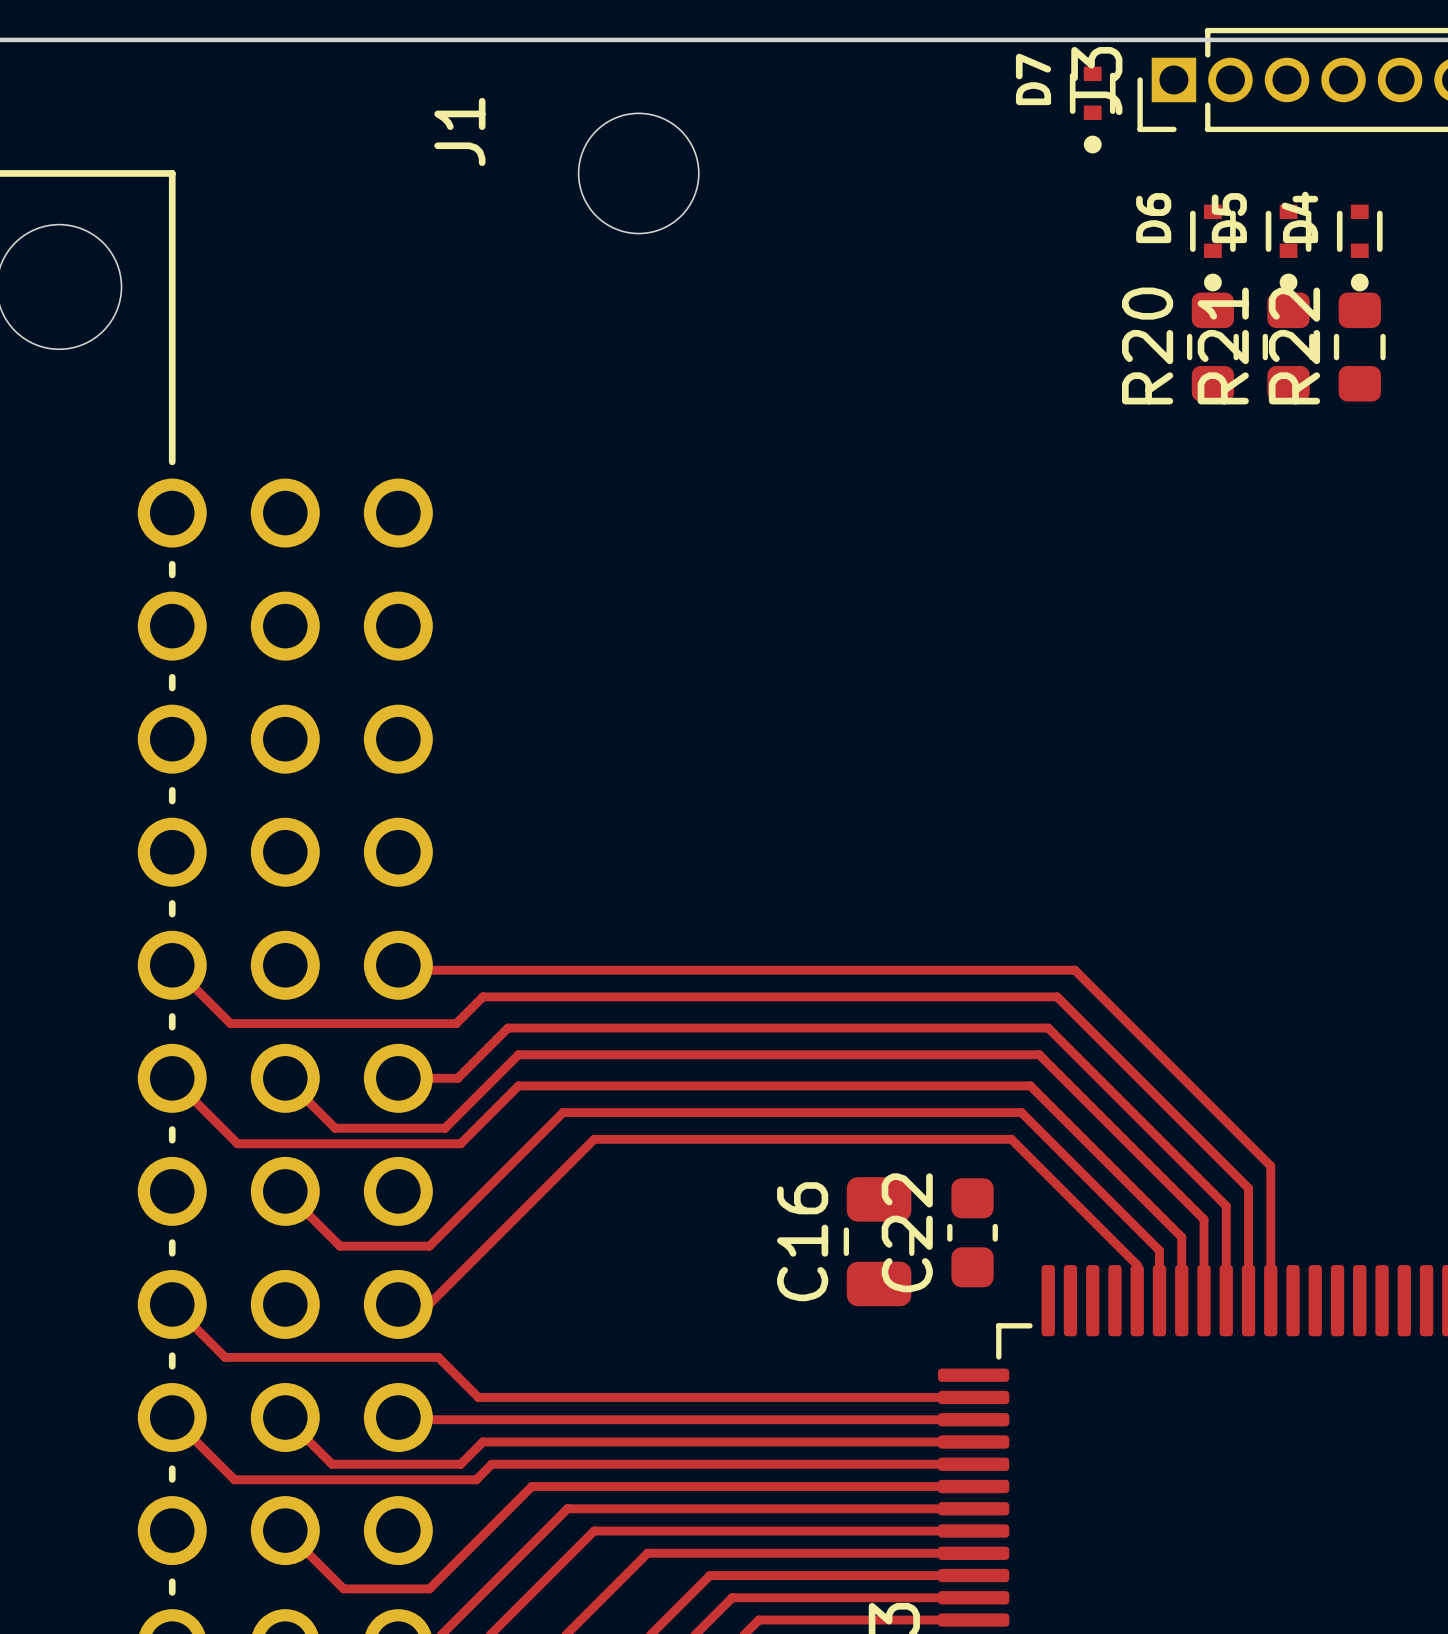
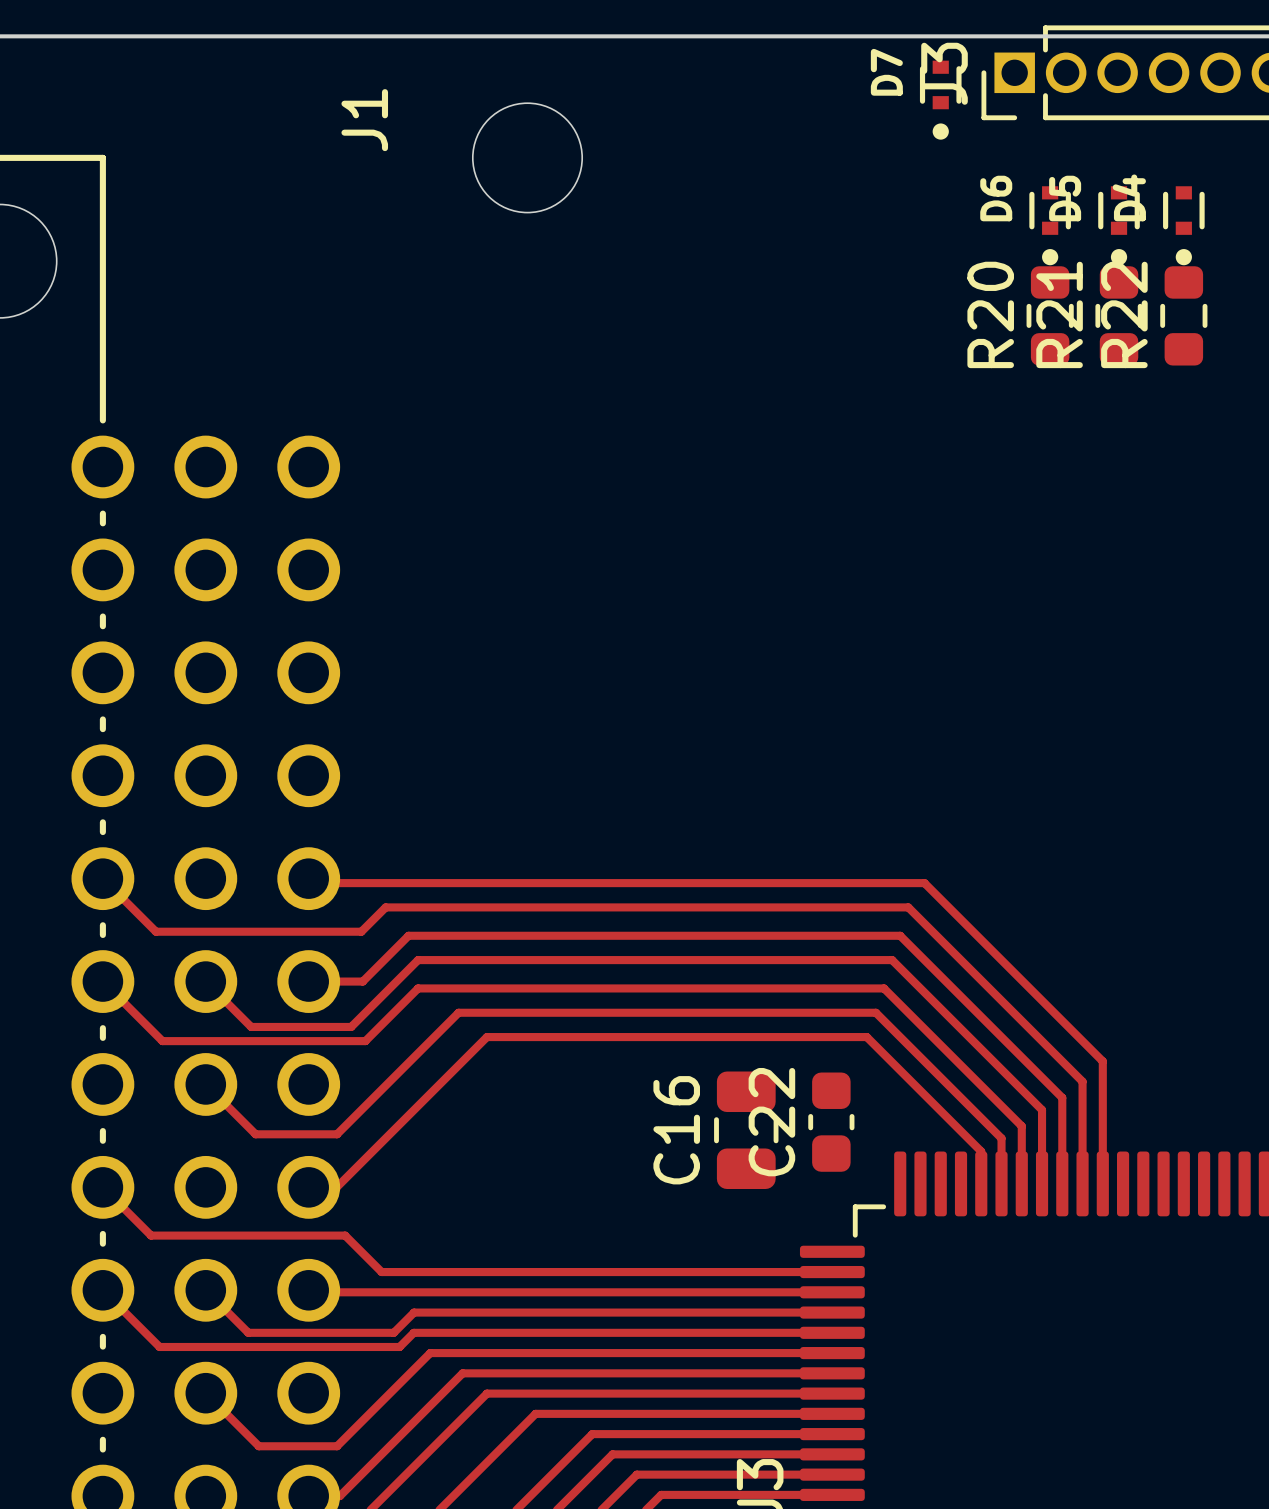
track: (514, 1441) (482, 1441) (460, 1464) -> (414, 1312) (393, 1332) (365, 1332)
track: (513, 1464) (491, 1464) (476, 1479) -> (413, 1332) (399, 1346) (379, 1346)

